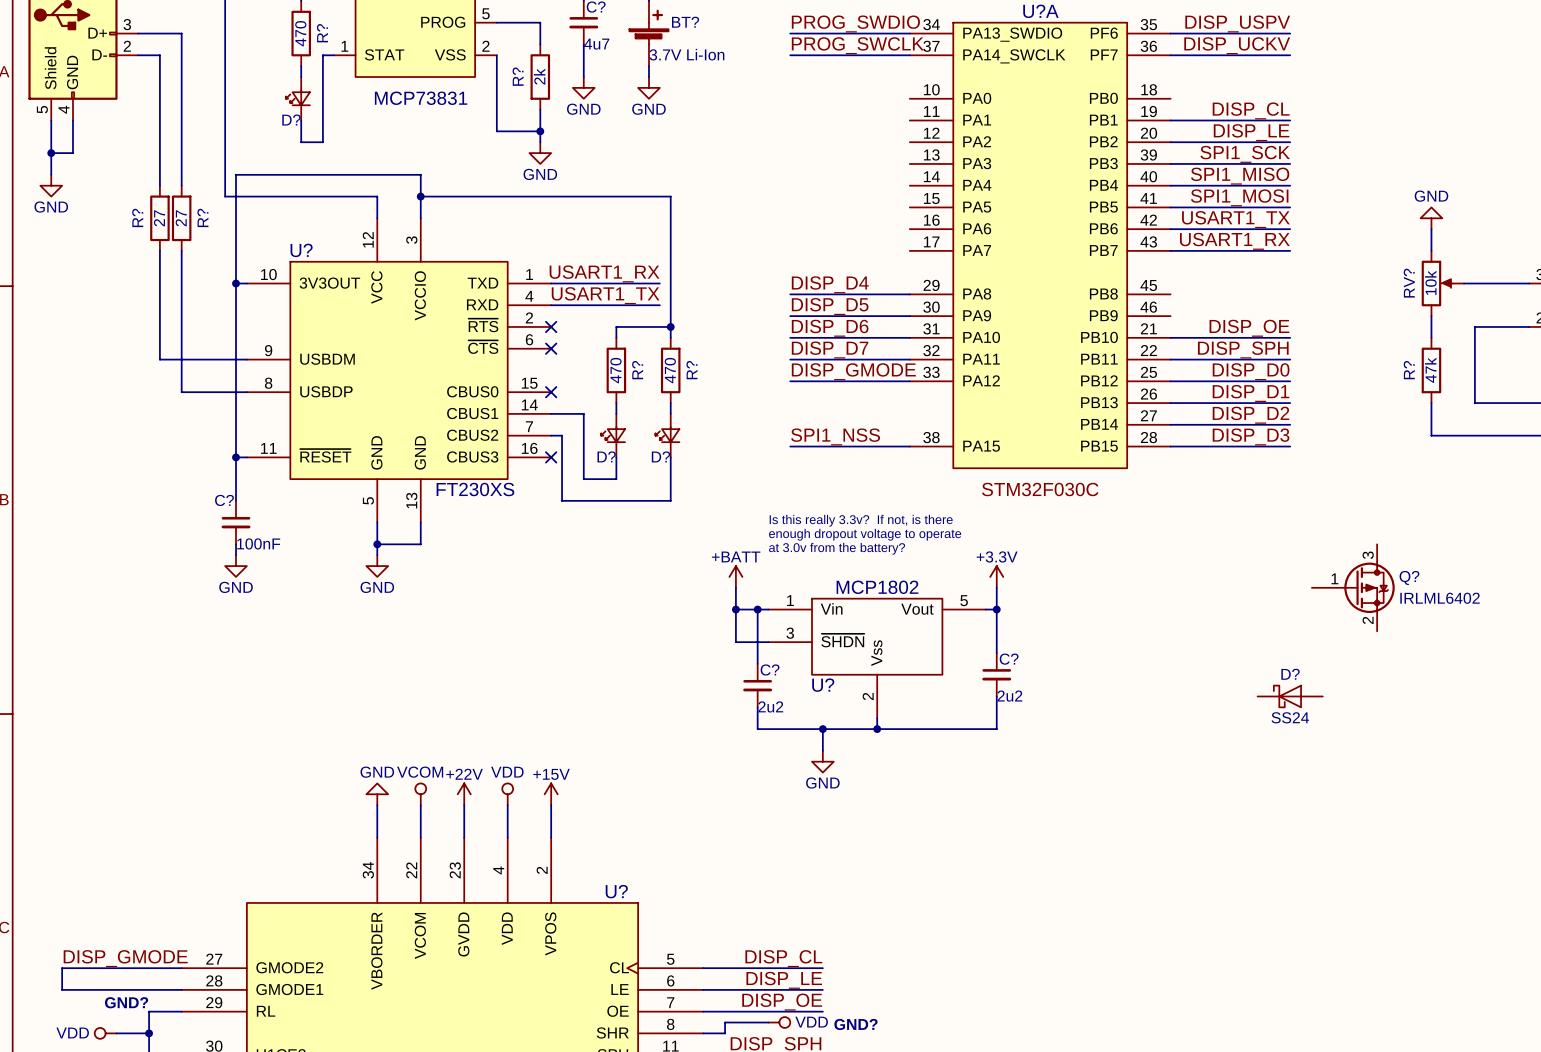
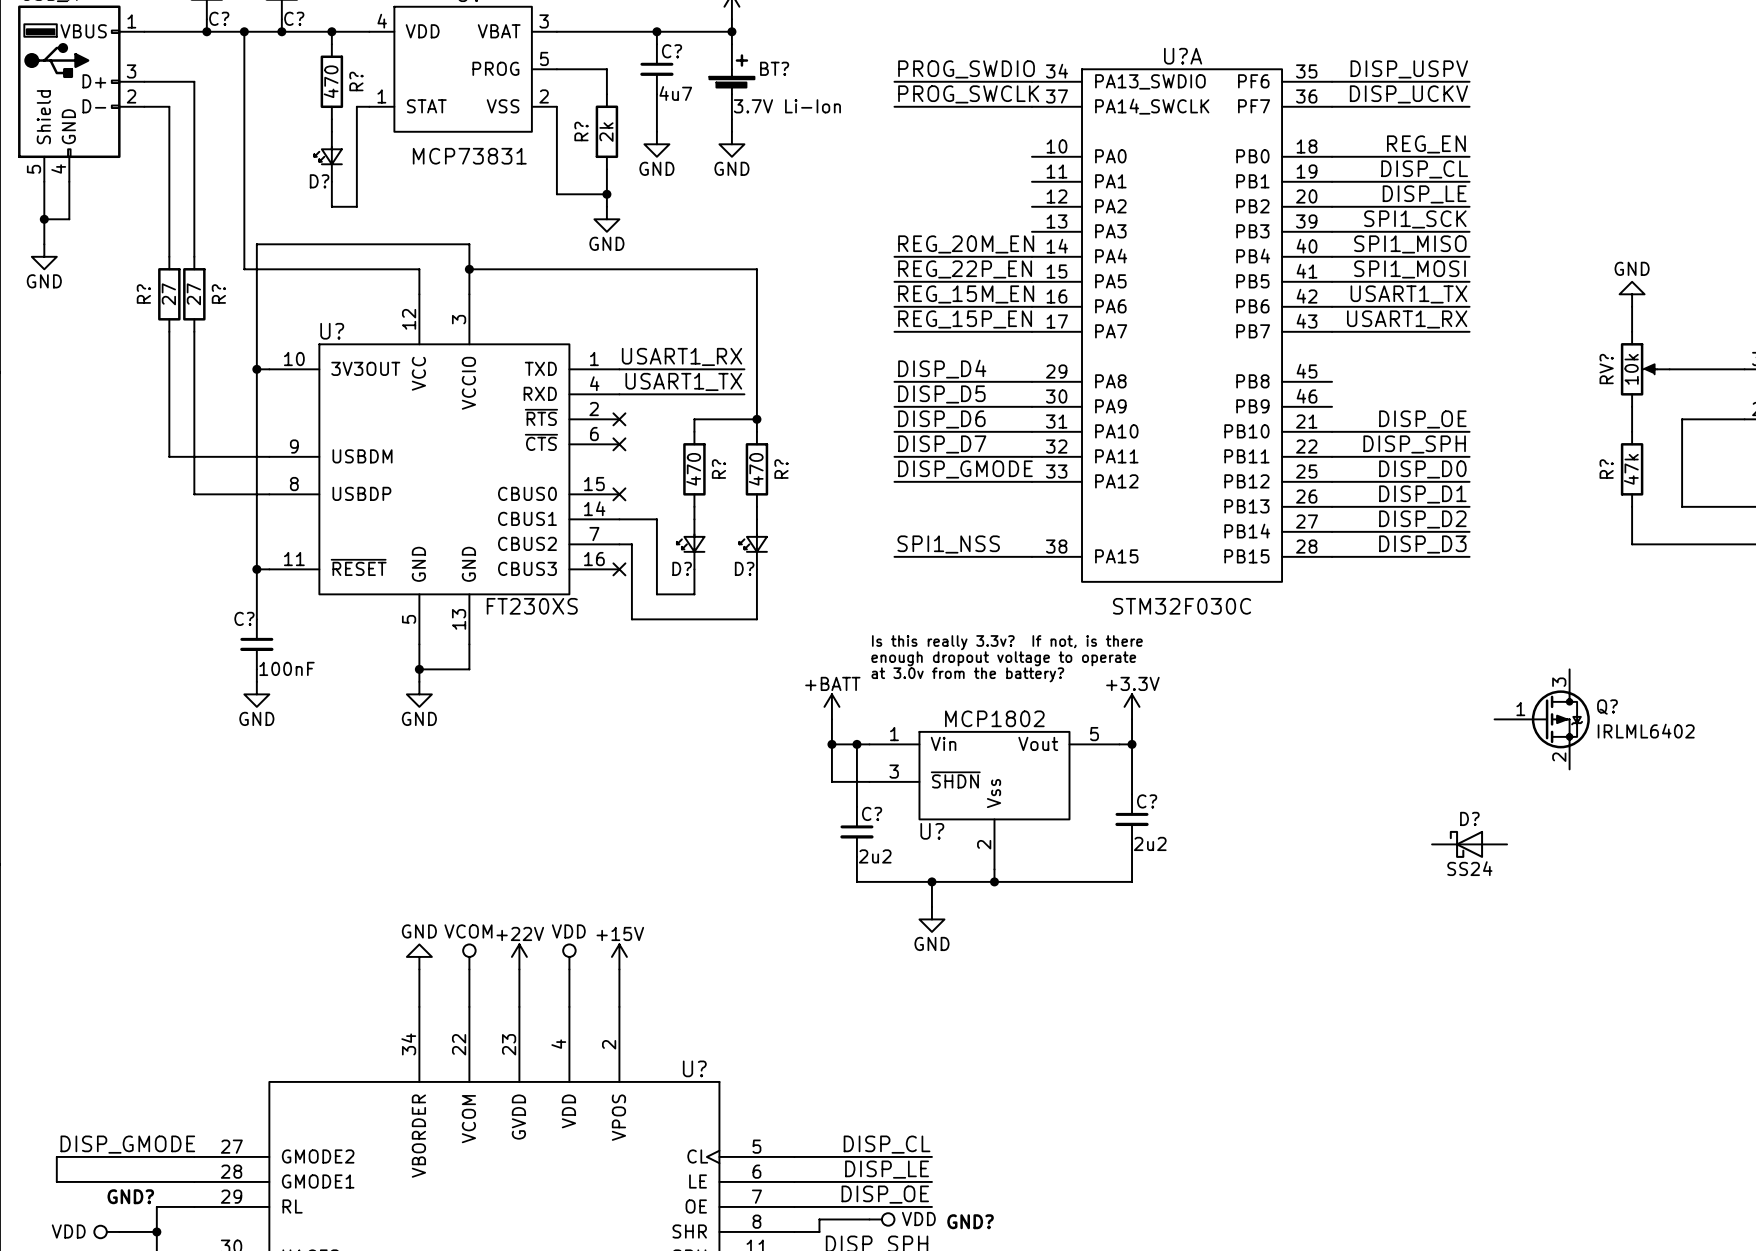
label: none -> REG_EN (1426, 144)
wire: none -> (1332, 156) (1469, 156)
label: none -> REG_20M_EN (966, 244)
wire: none -> (894, 256) (1031, 256)
label: none -> REG_22P_EN (965, 269)
wire: none -> (894, 281) (1031, 281)
label: none -> REG_15M_EN (966, 294)
wire: none -> (894, 306) (1031, 306)
label: none -> REG_15P_EN (965, 319)
wire: none -> (894, 331) (1031, 331)

